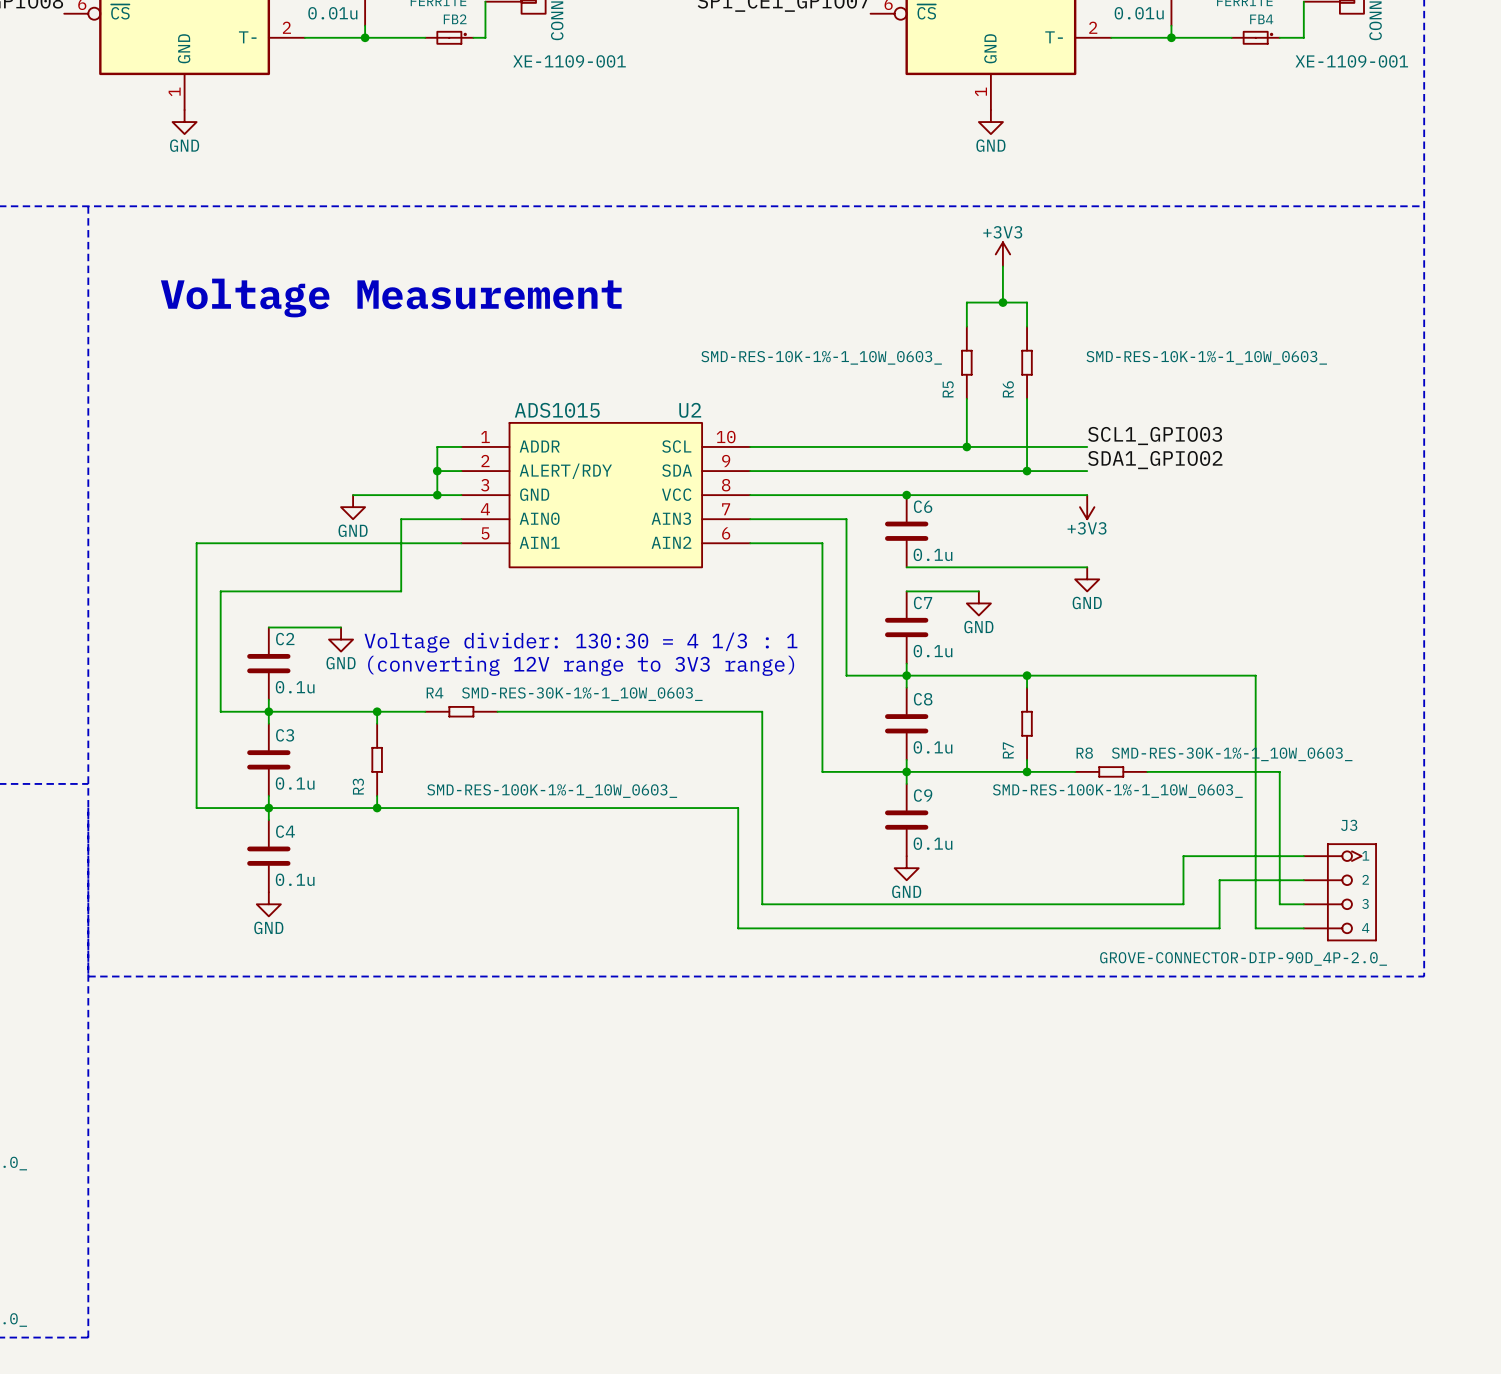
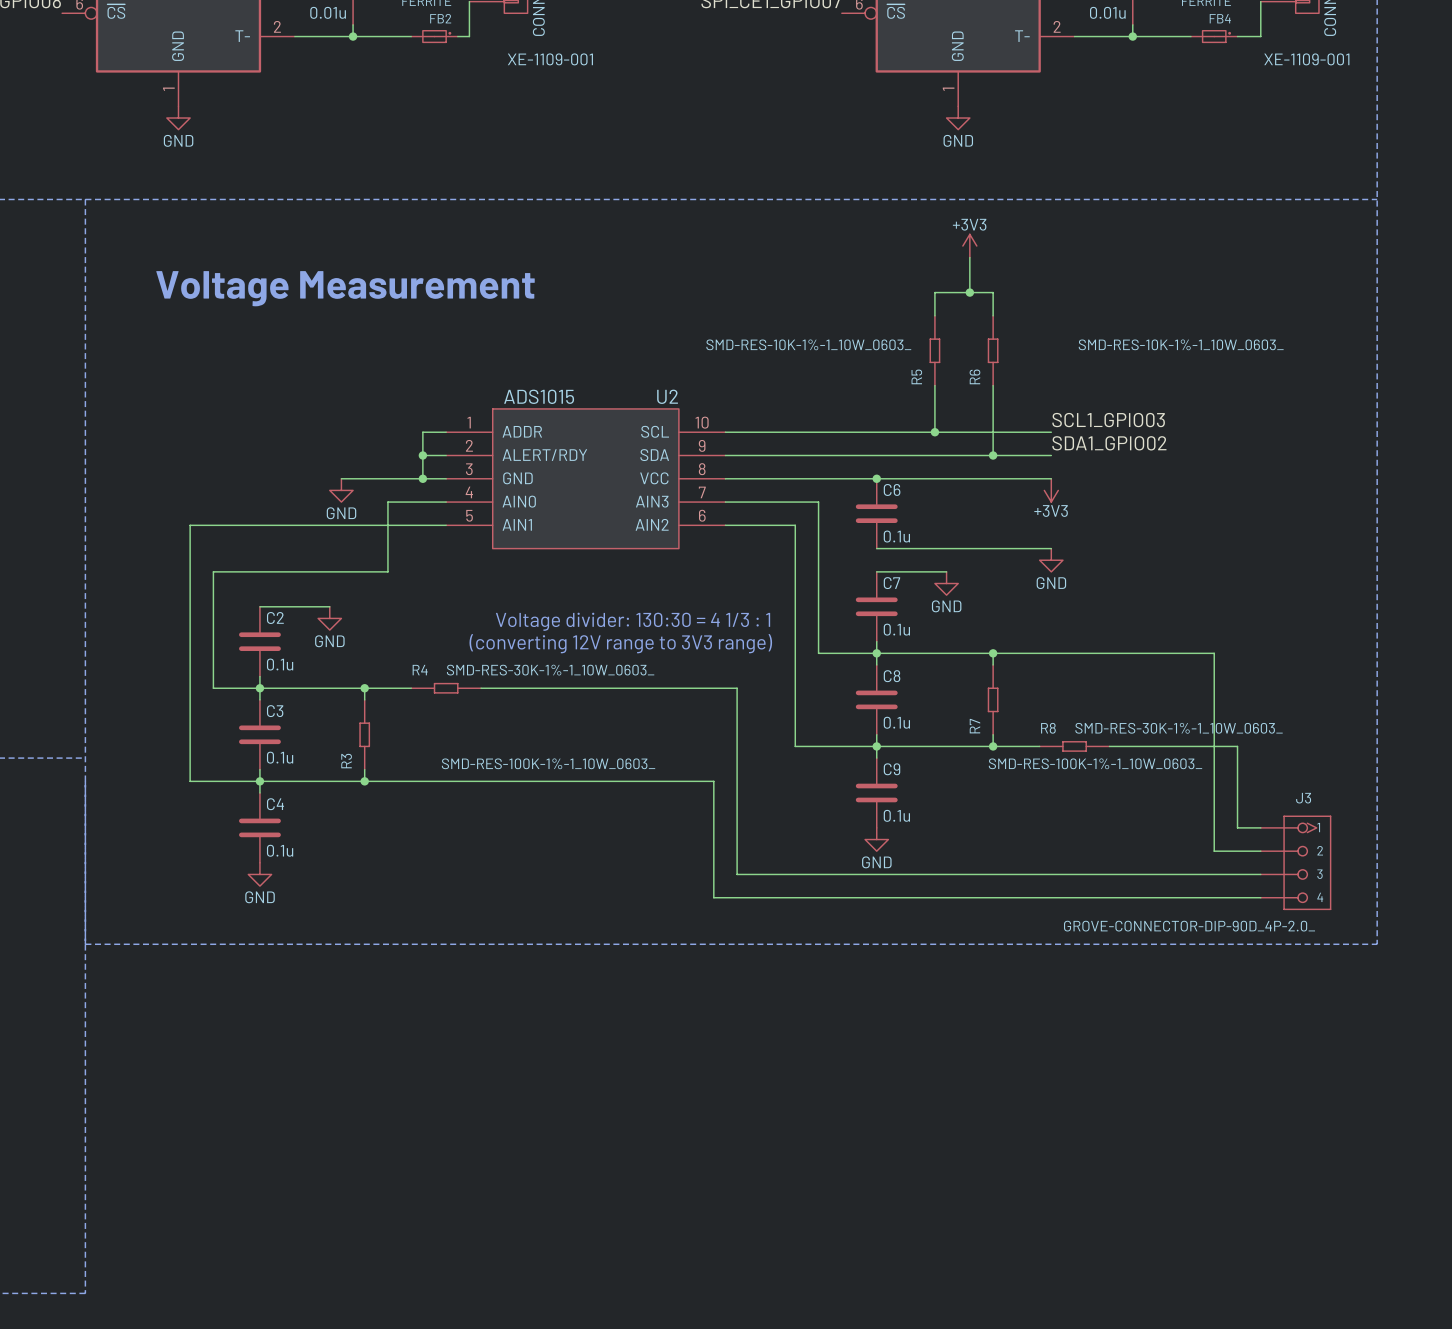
wire: (1183, 904) (1183, 856) (1279, 856) (1279, 904) -> (1144, 874) (1237, 874)
wire: (1219, 928) (1219, 880) (1255, 880) (1255, 928) -> (1179, 897) (1214, 897)

